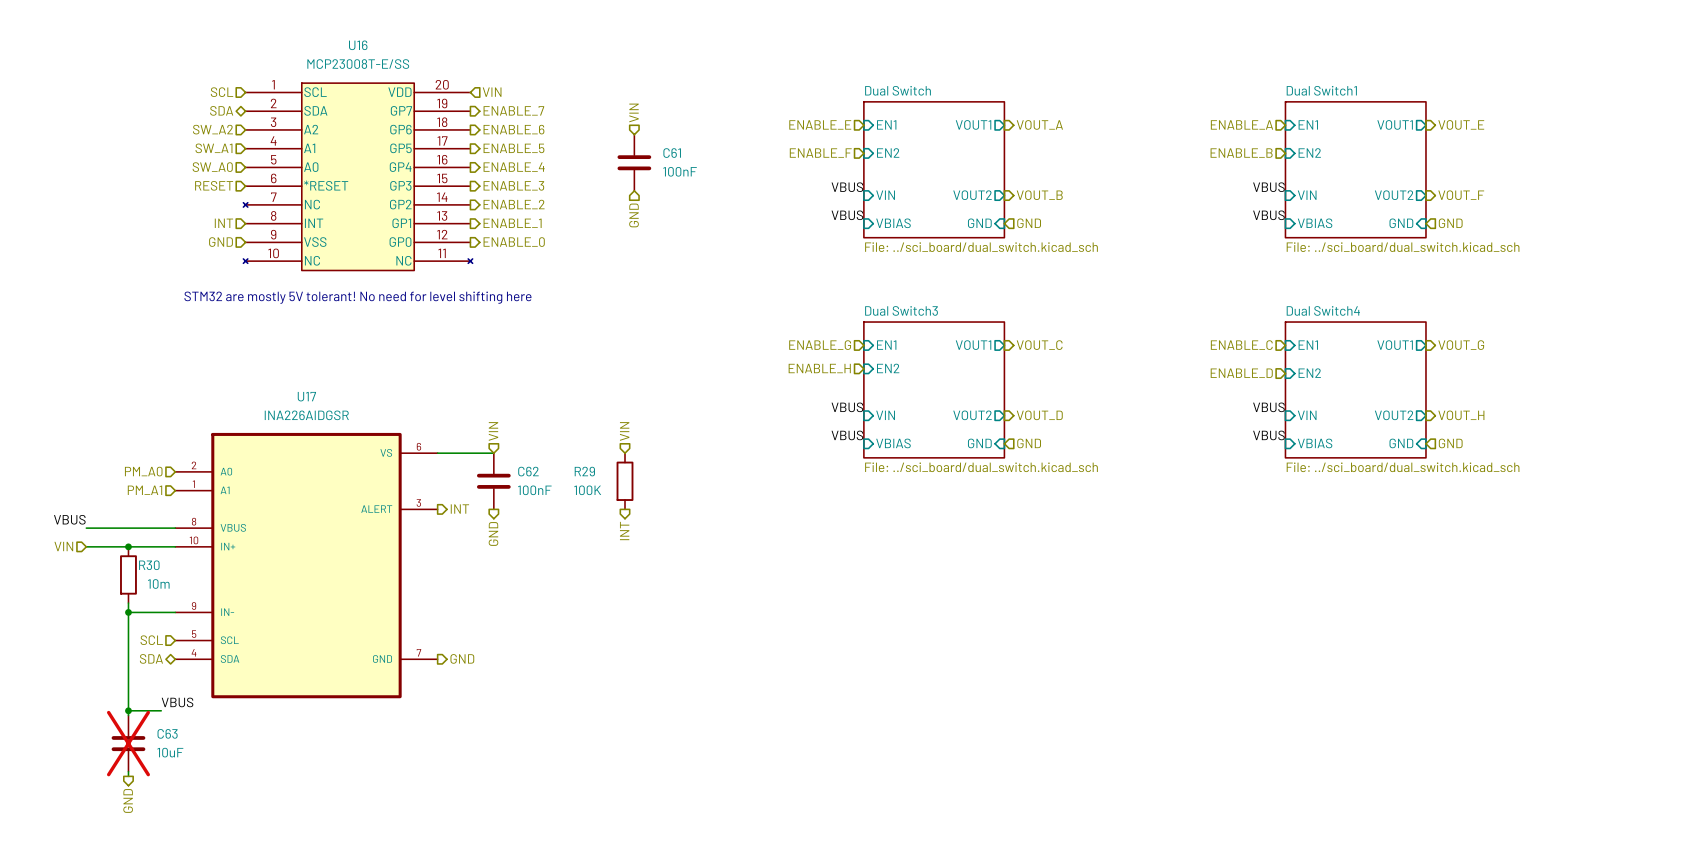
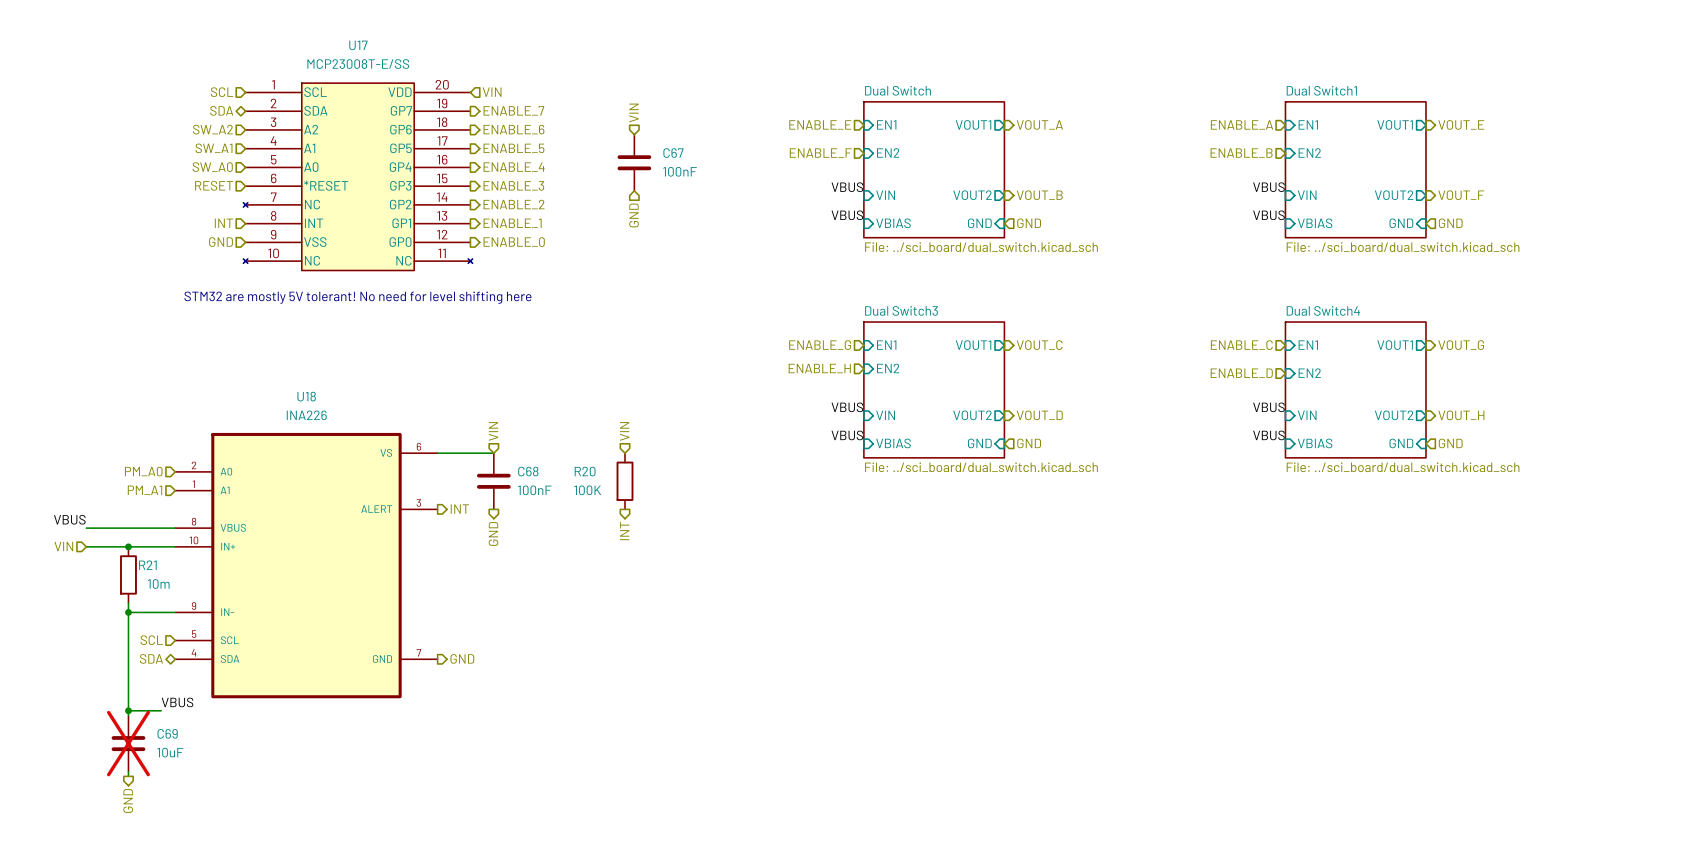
U16 name: U16 (358, 45) -> U17 (358, 45)
C61 name: C61 (672, 153) -> C67 (673, 153)
U17 name: U17 (306, 396) -> U18 (306, 396)
U17 value: INA226AIDGSR (306, 415) -> INA226 (306, 415)
C62 name: C62 (528, 471) -> C68 (528, 471)
R29 name: R29 (584, 471) -> R20 (585, 471)
R30 name: R30 (149, 565) -> R21 (147, 565)
C63 name: C63 (167, 733) -> C69 (167, 733)

